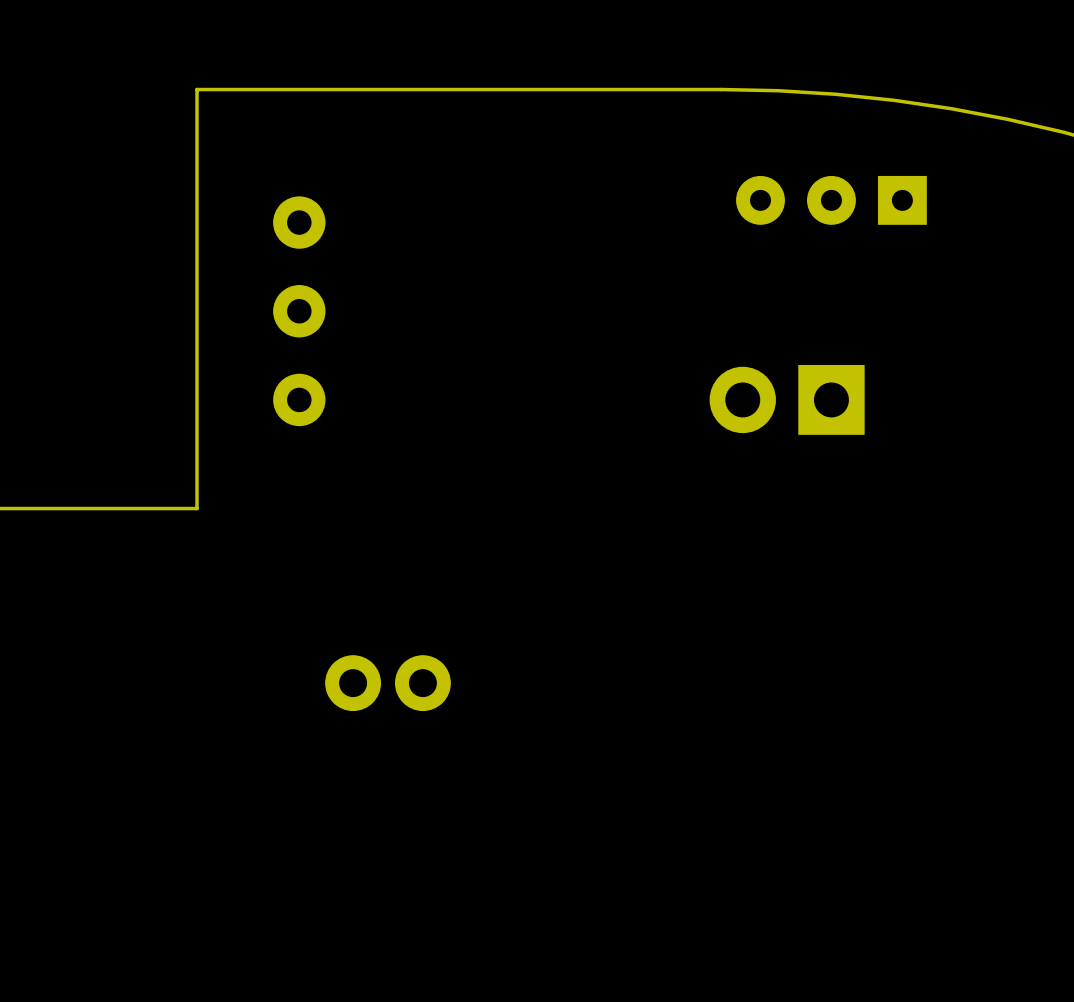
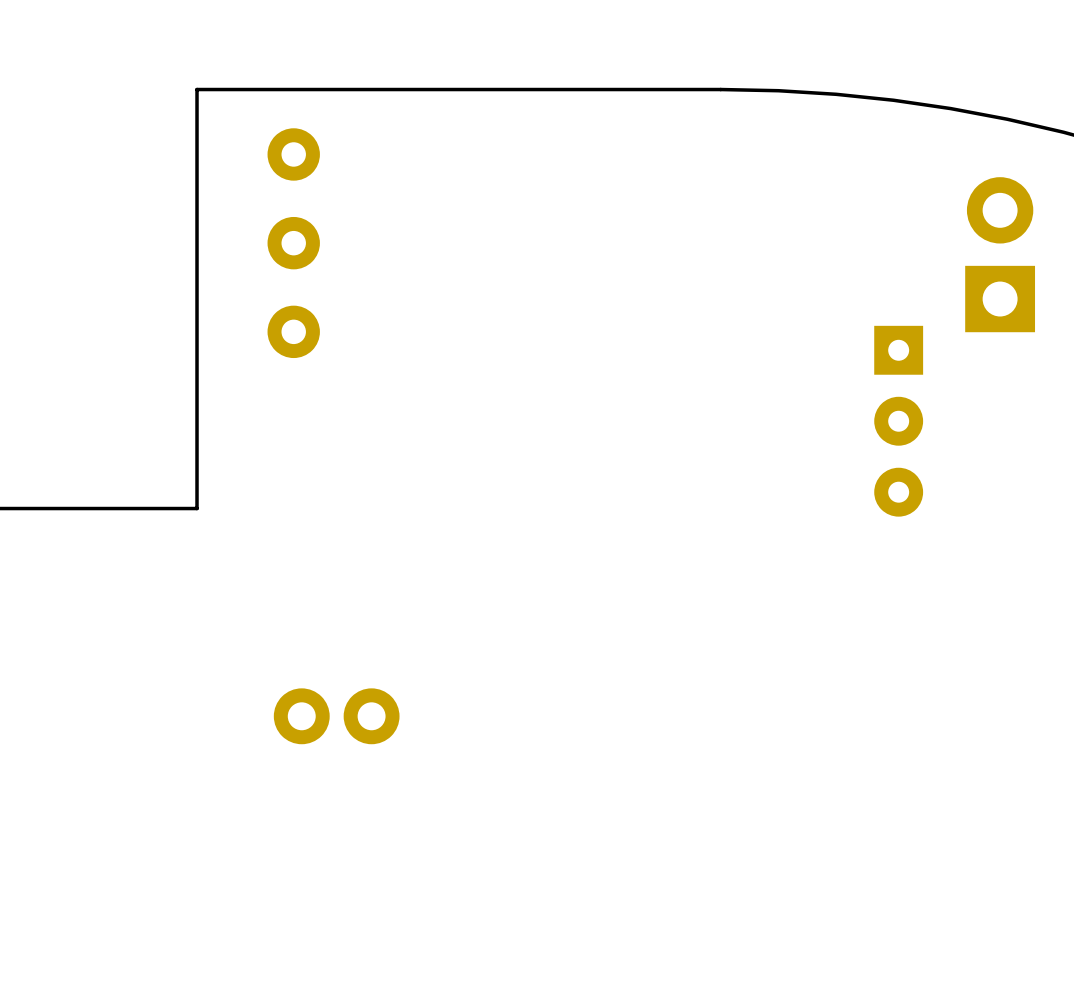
part rotation: 0° (831, 200) -> 90° counterclockwise (898, 421)
part position: (831, 200) -> (898, 421)
part position: (299, 311) -> (293, 243)
part rotation: 0° (787, 399) -> 90° clockwise (1000, 254)
part position: (787, 399) -> (1000, 254)
part position: (388, 683) -> (336, 716)

